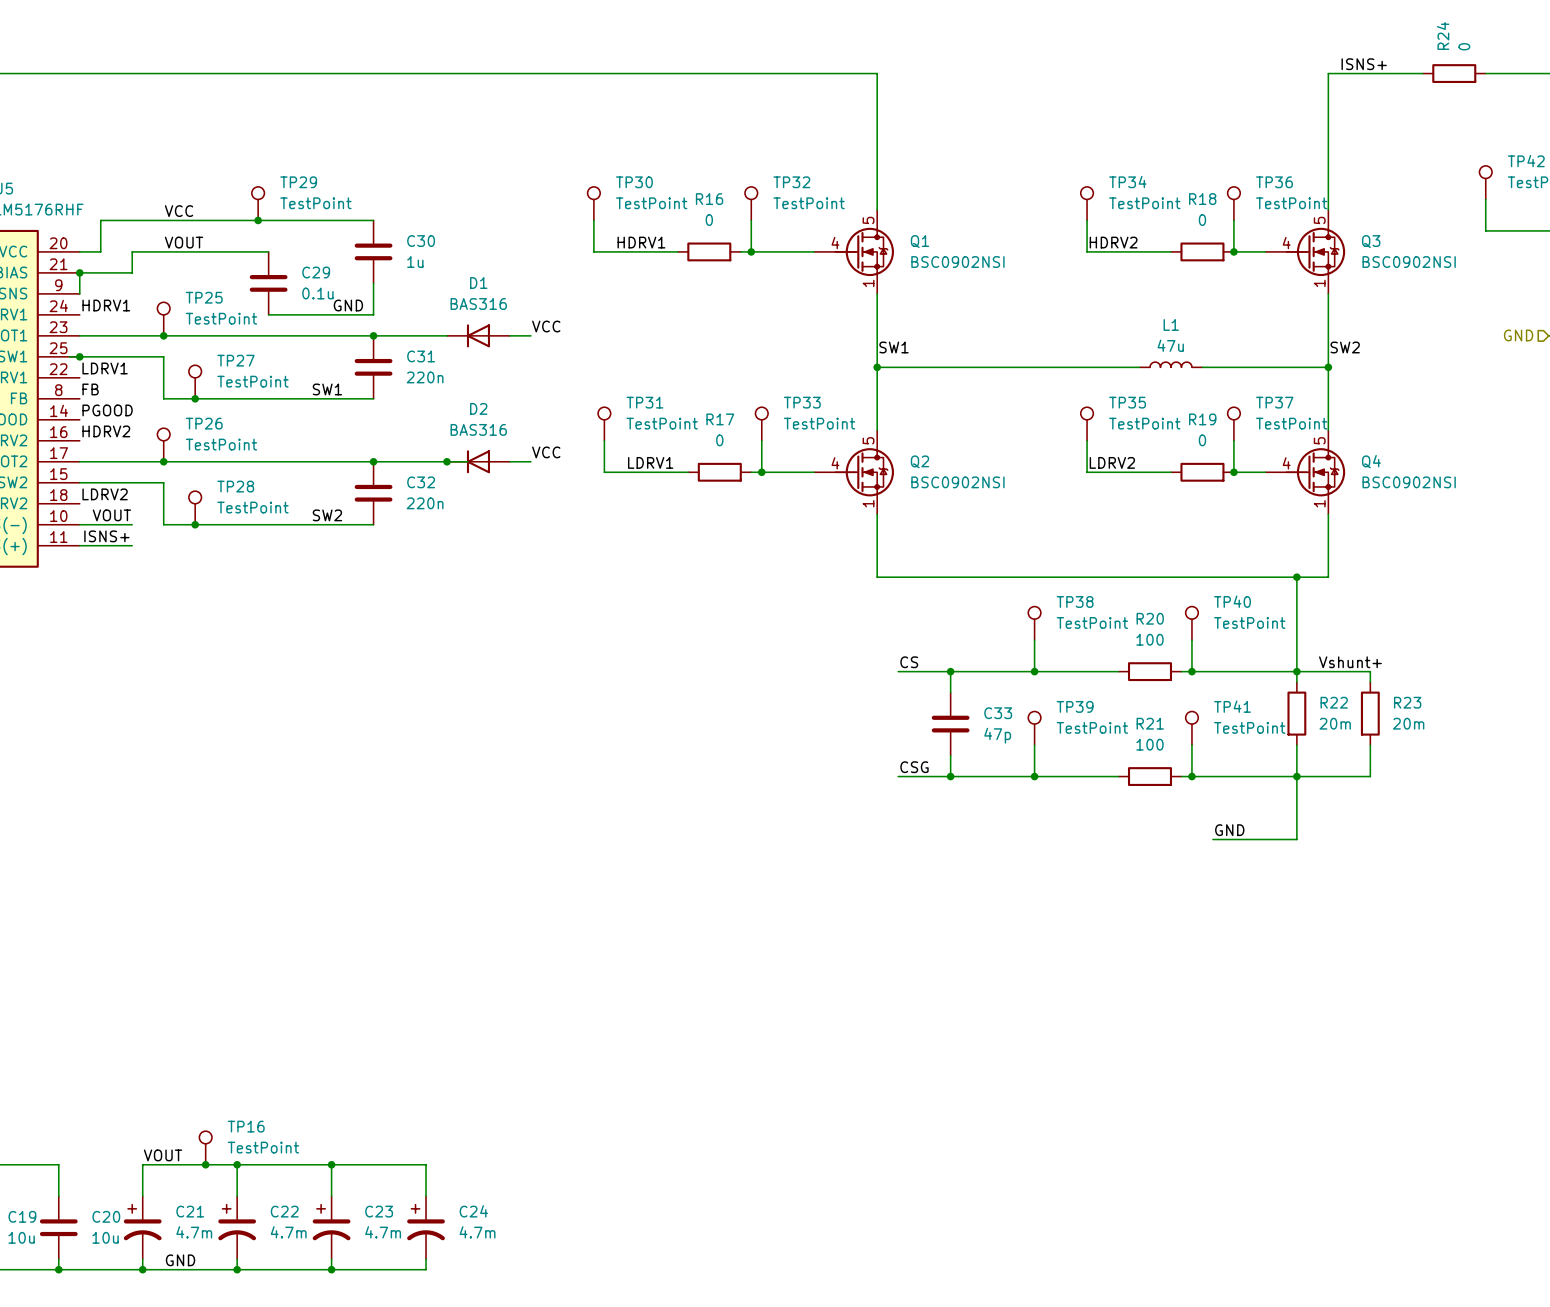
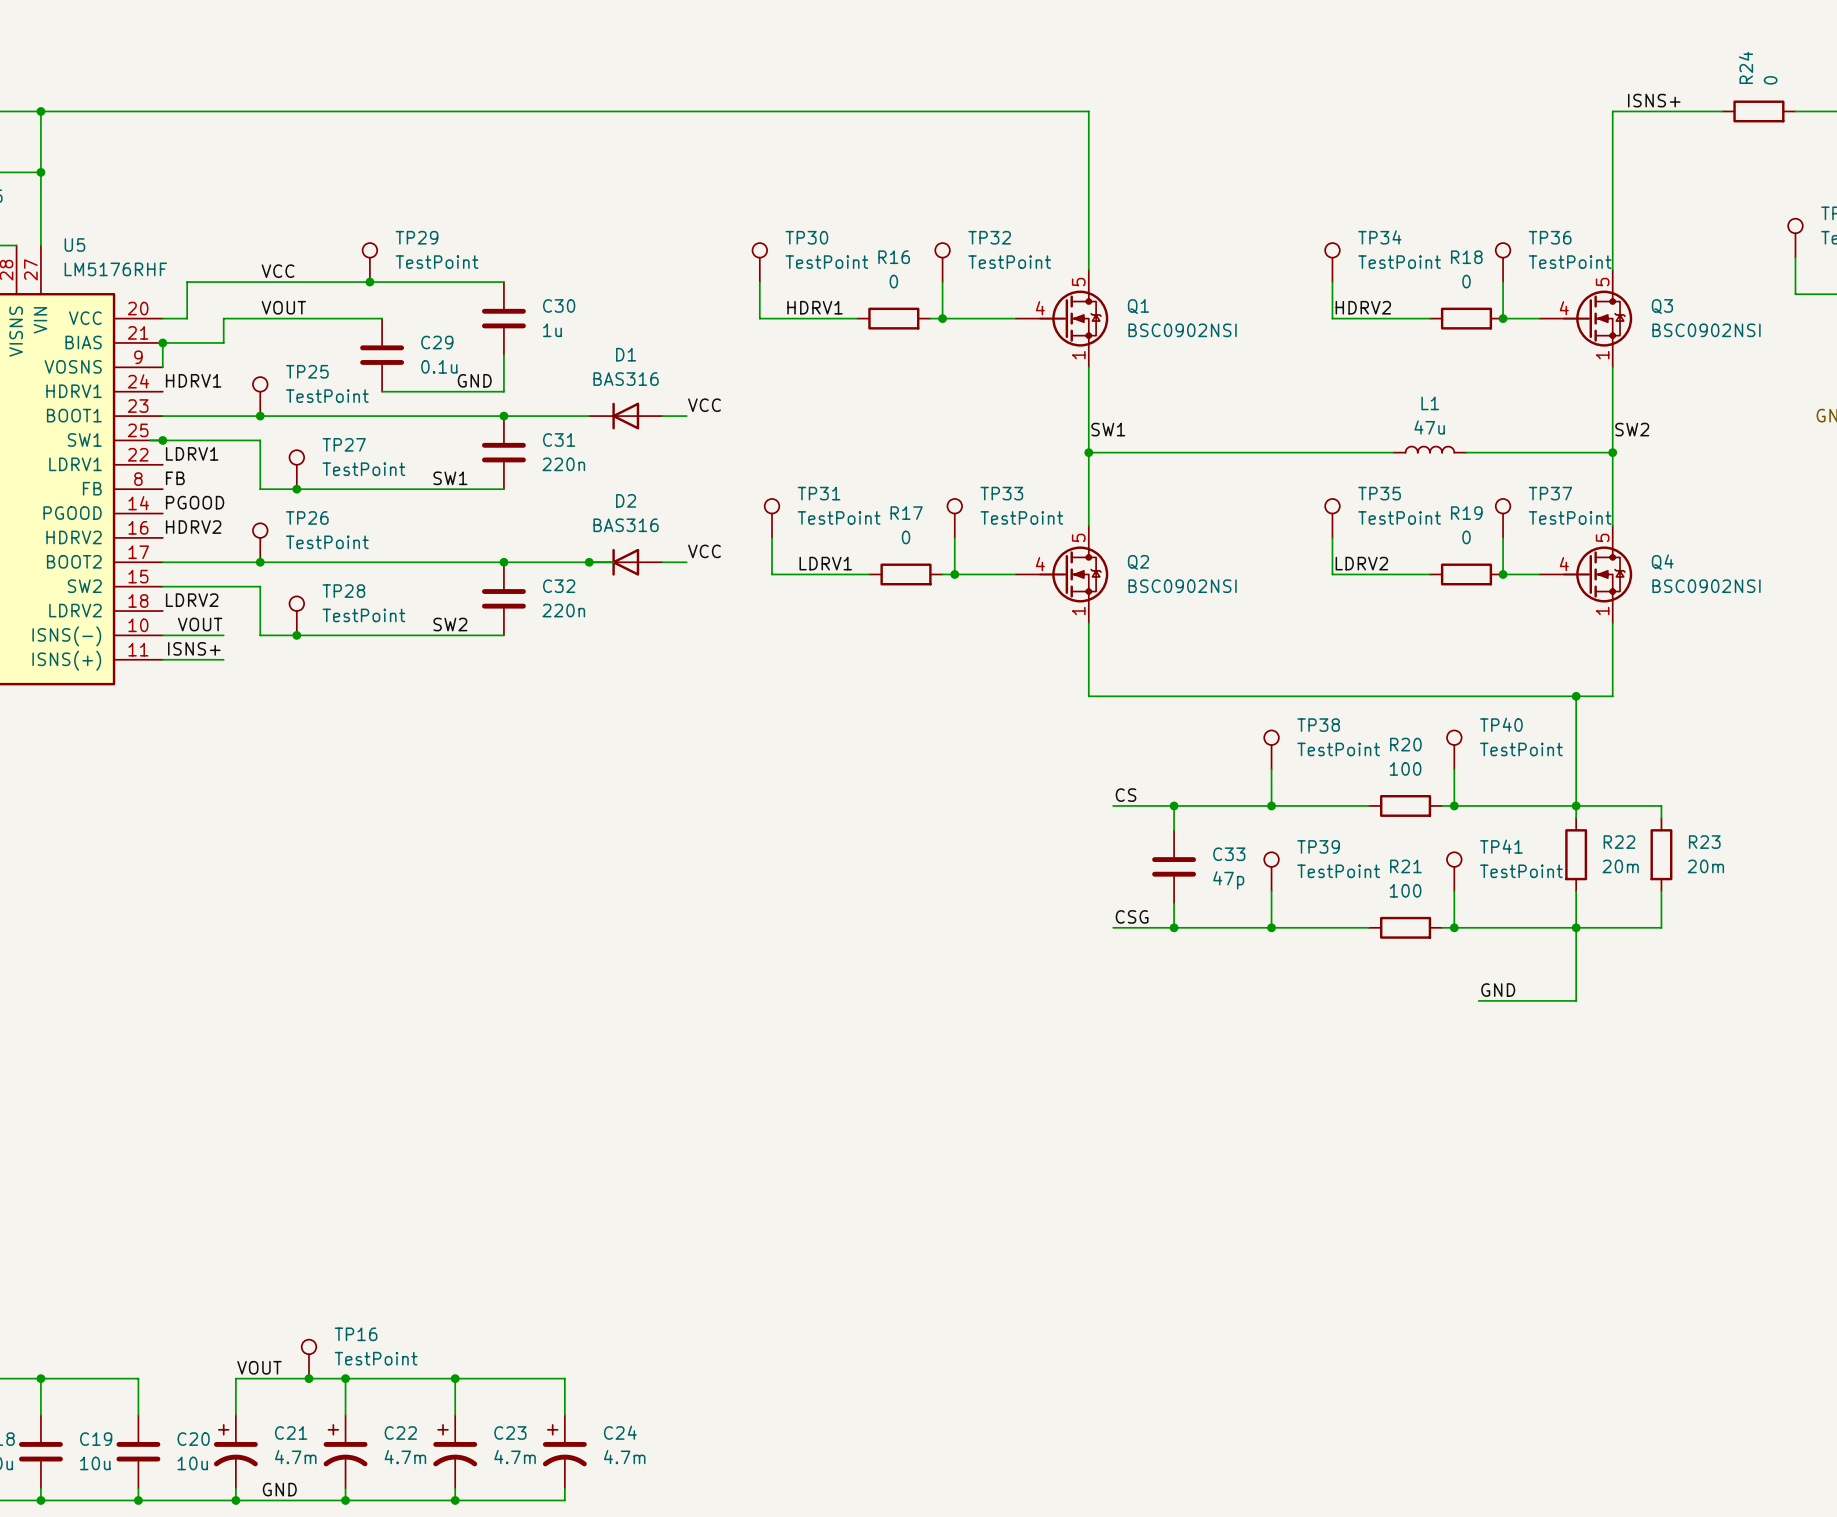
label: Vshunt+ (1350, 662) -> none

